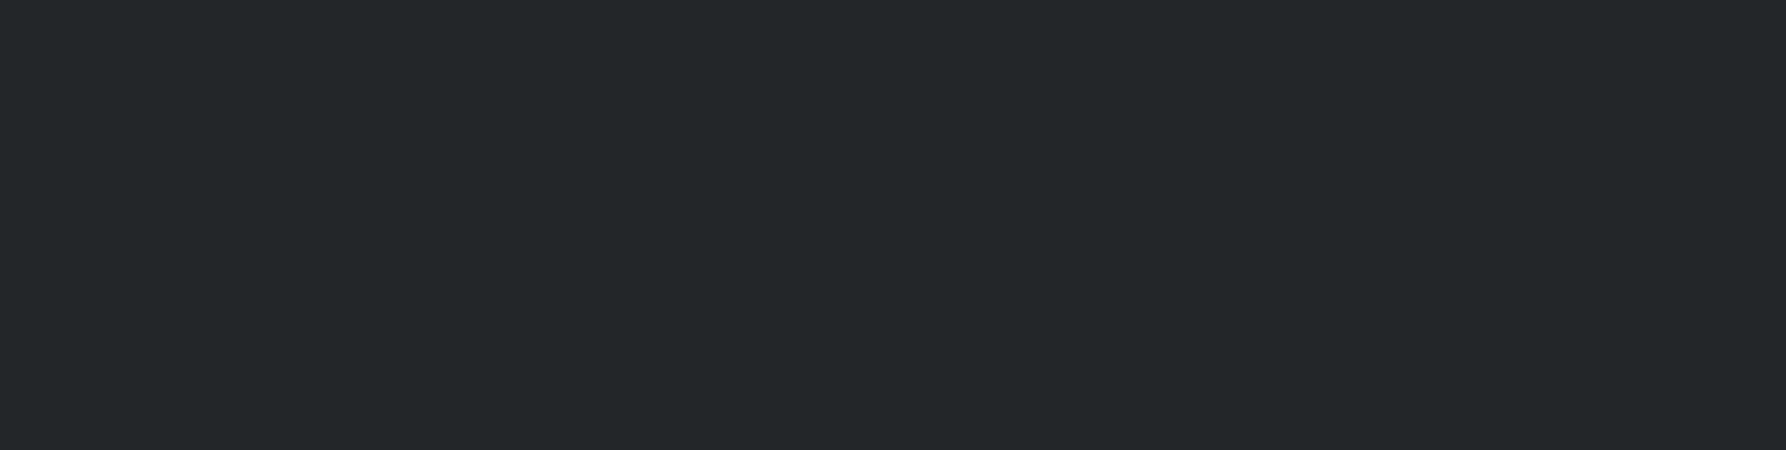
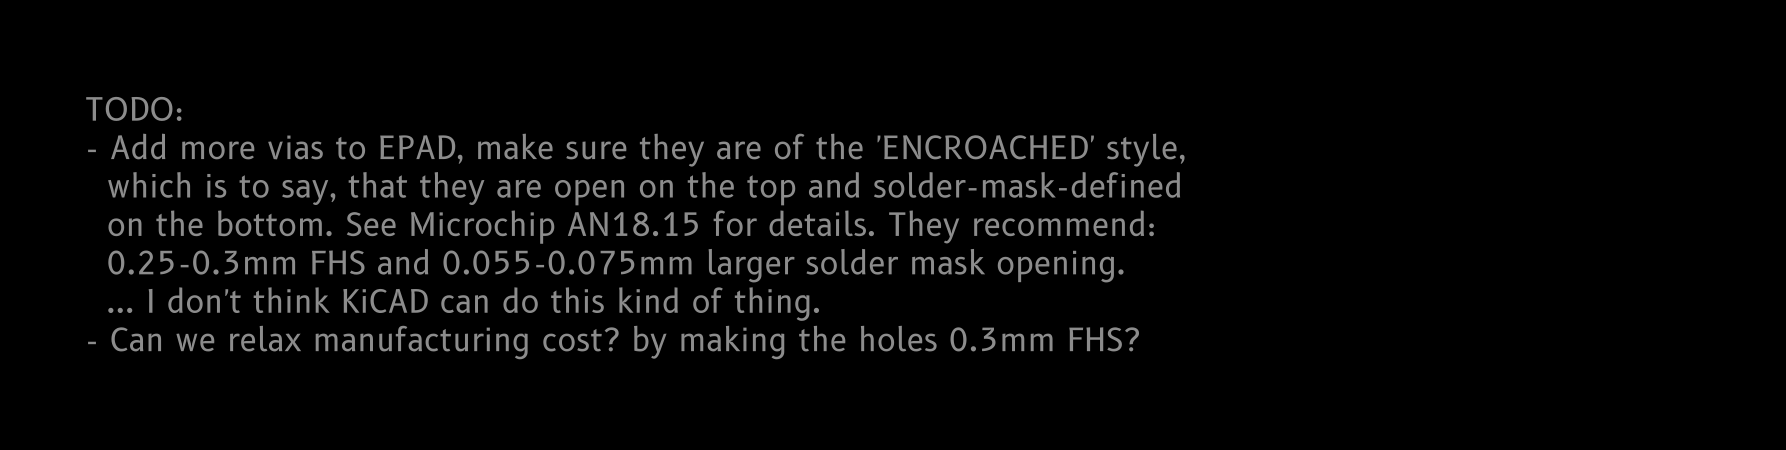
text: none -> TODO: (133, 108)
text: none -> - Add more vias to EPAD, make sure they are of the 'ENCROACHED' style, (636, 150)
text: none -> which is to say, that they are open on the top and solder-mask-defined (644, 188)
text: none -> on the bottom. See Microchip AN18.15 for details. They recommend: (631, 227)
text: none -> 0.25-0.3mm FHS and 0.055-0.075mm larger solder mask opening. (615, 265)
text: none -> ... I don't think KiCAD can do this kind of thing. (463, 304)
text: none -> - Can we relax manufacturing cost? by making the holes 0.3mm FHS? (613, 342)

